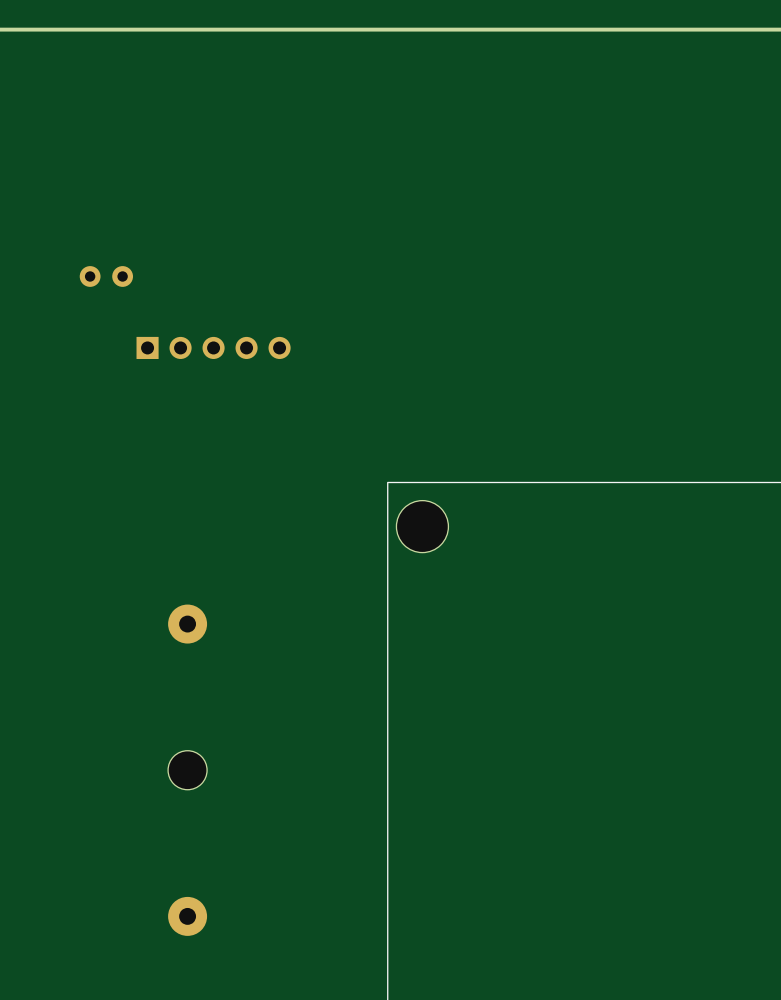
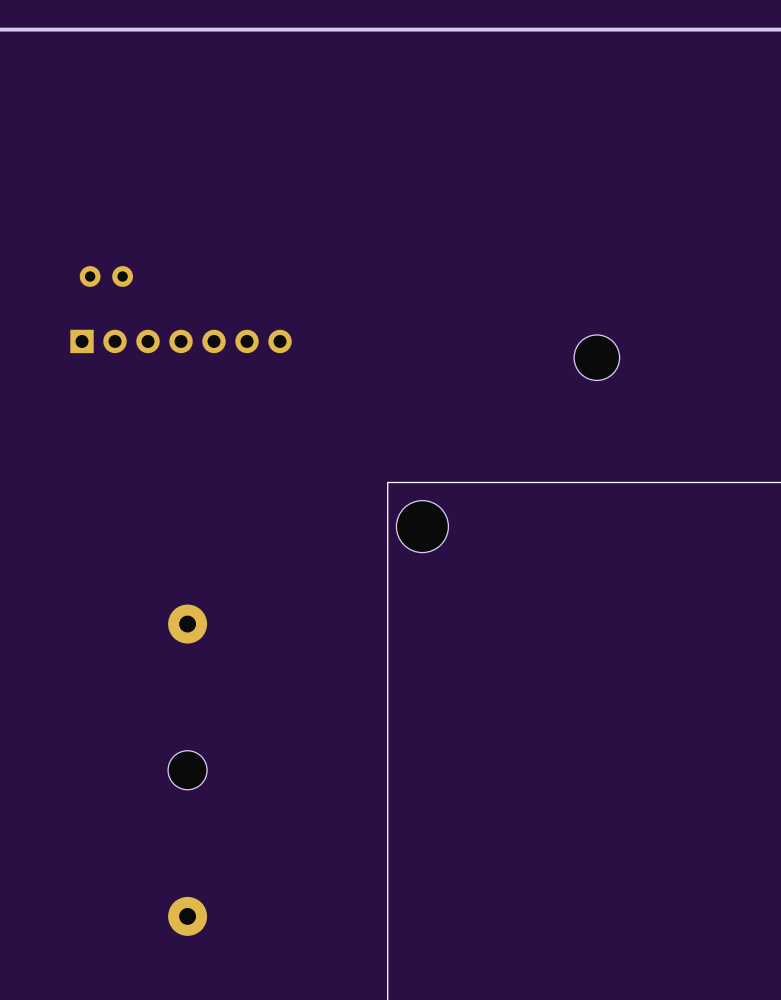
part: none -> (181, 341)
part: (213, 347) -> none
part: none -> (596, 357)

